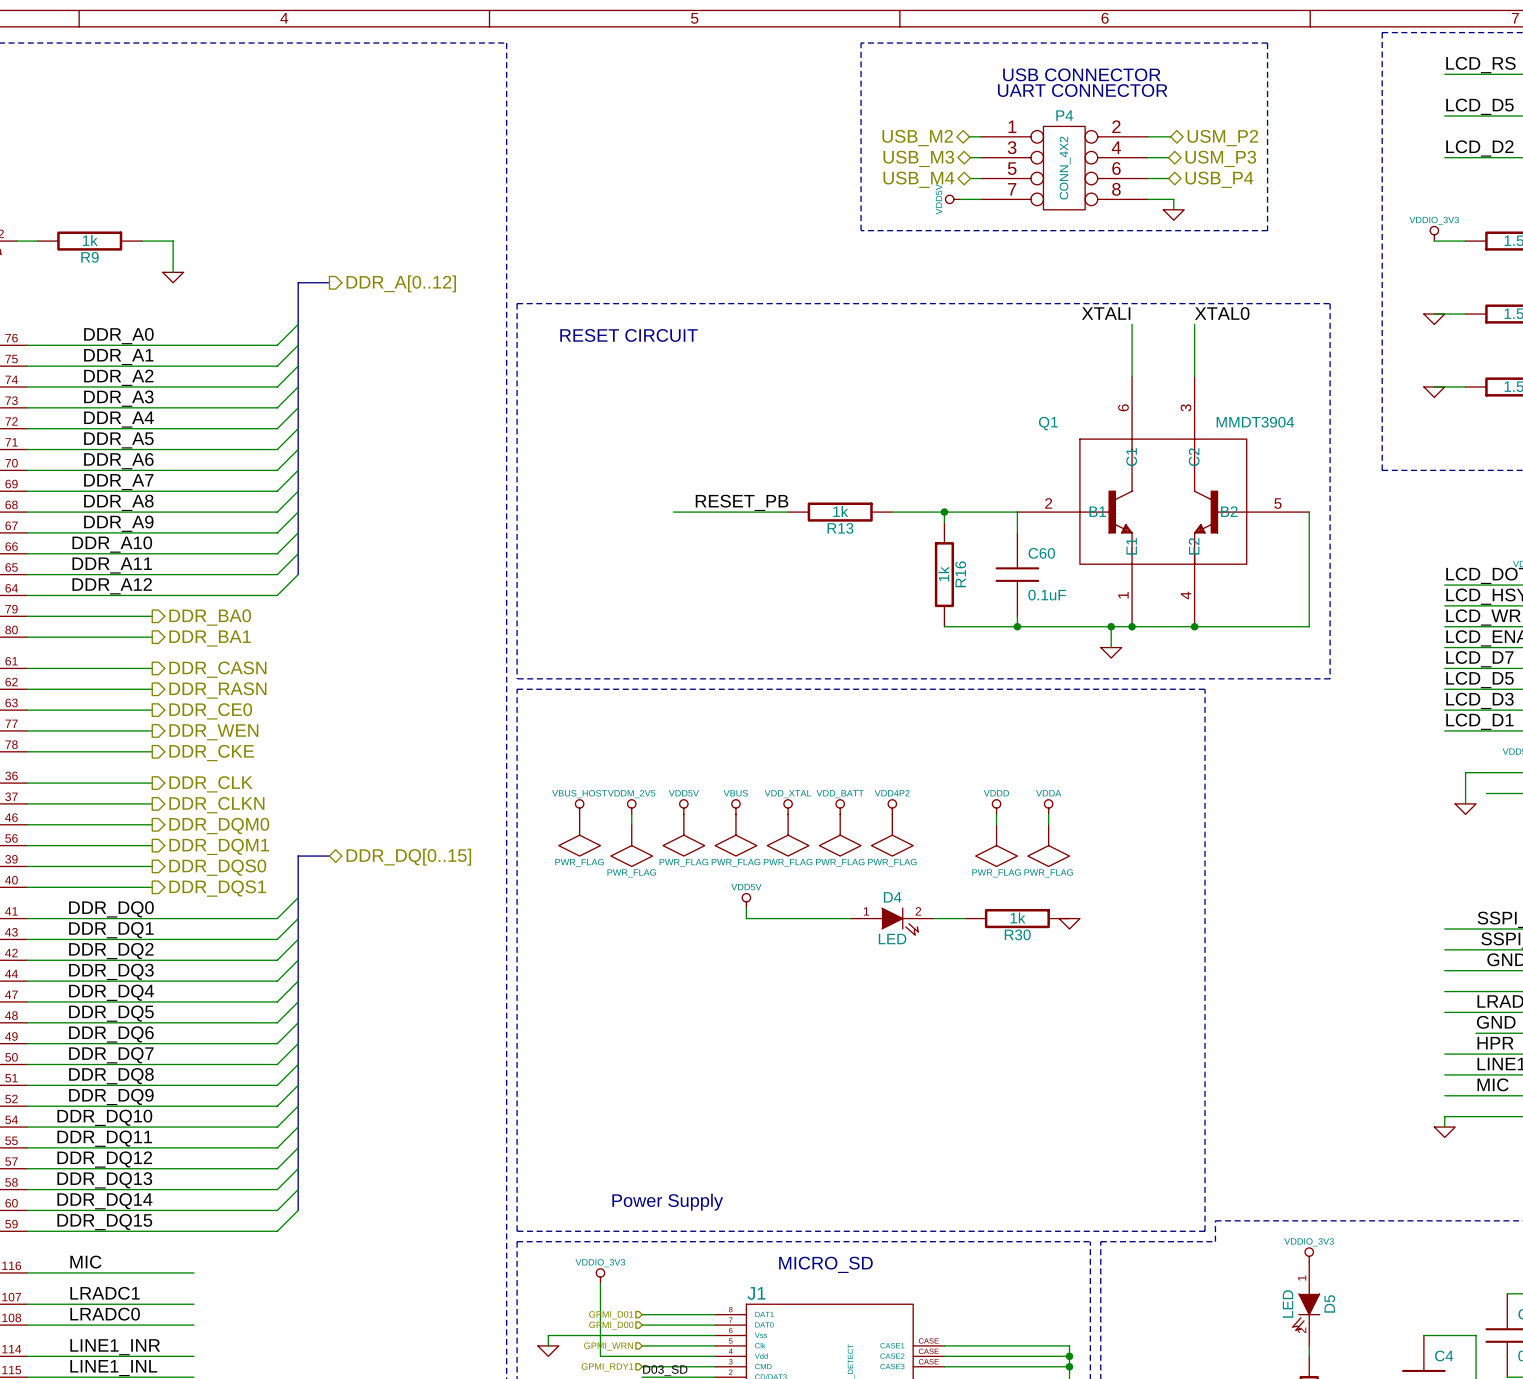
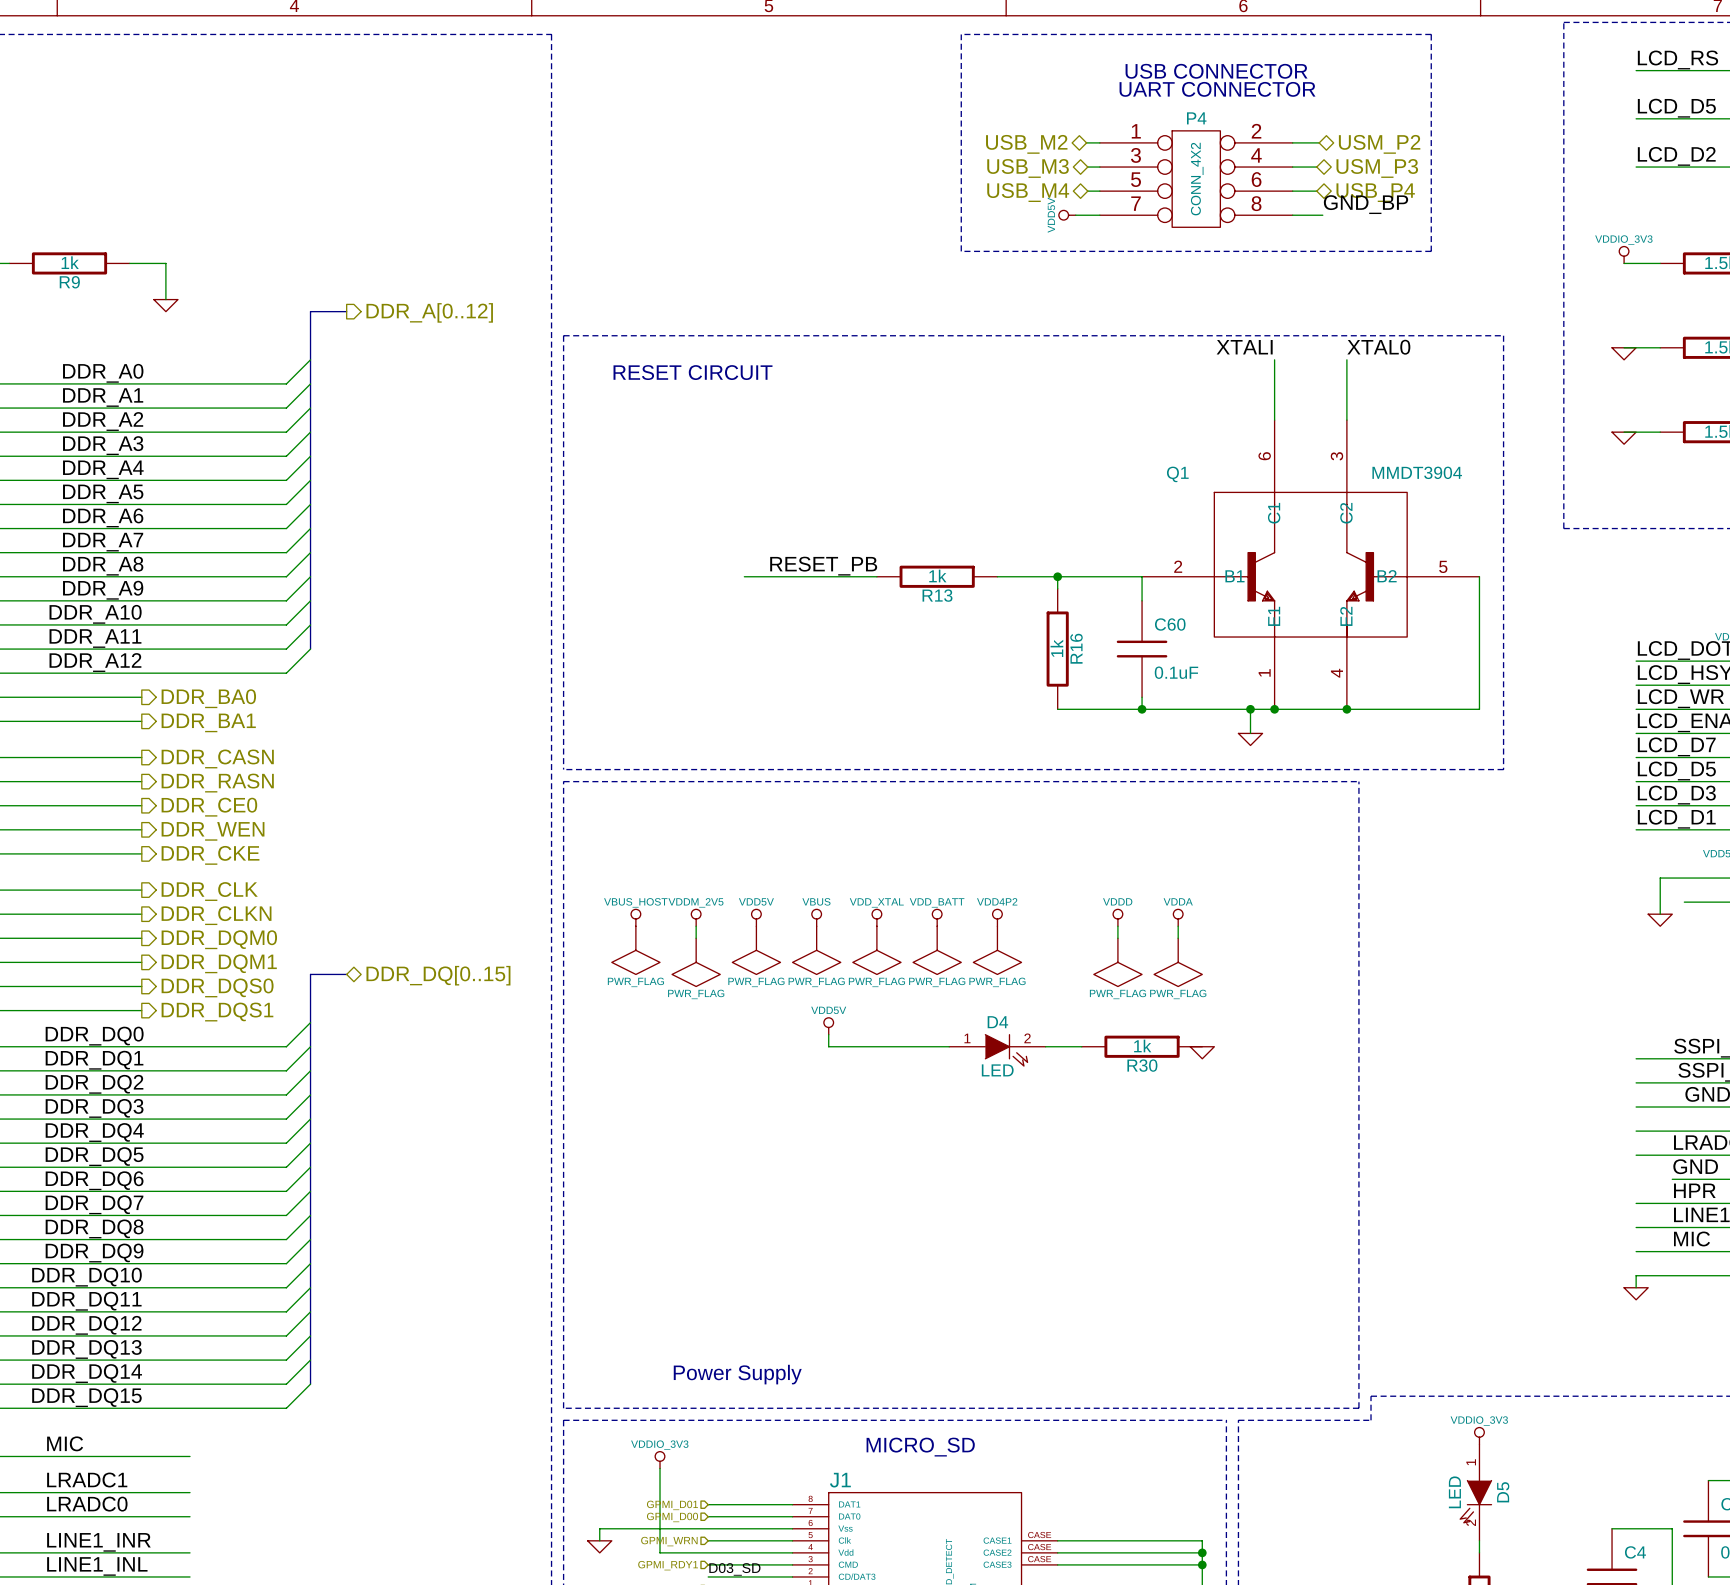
label: none -> GND_BP (1365, 204)
wire: (1173, 199) (1173, 209) -> none
power symbol: (1173, 215) -> none

